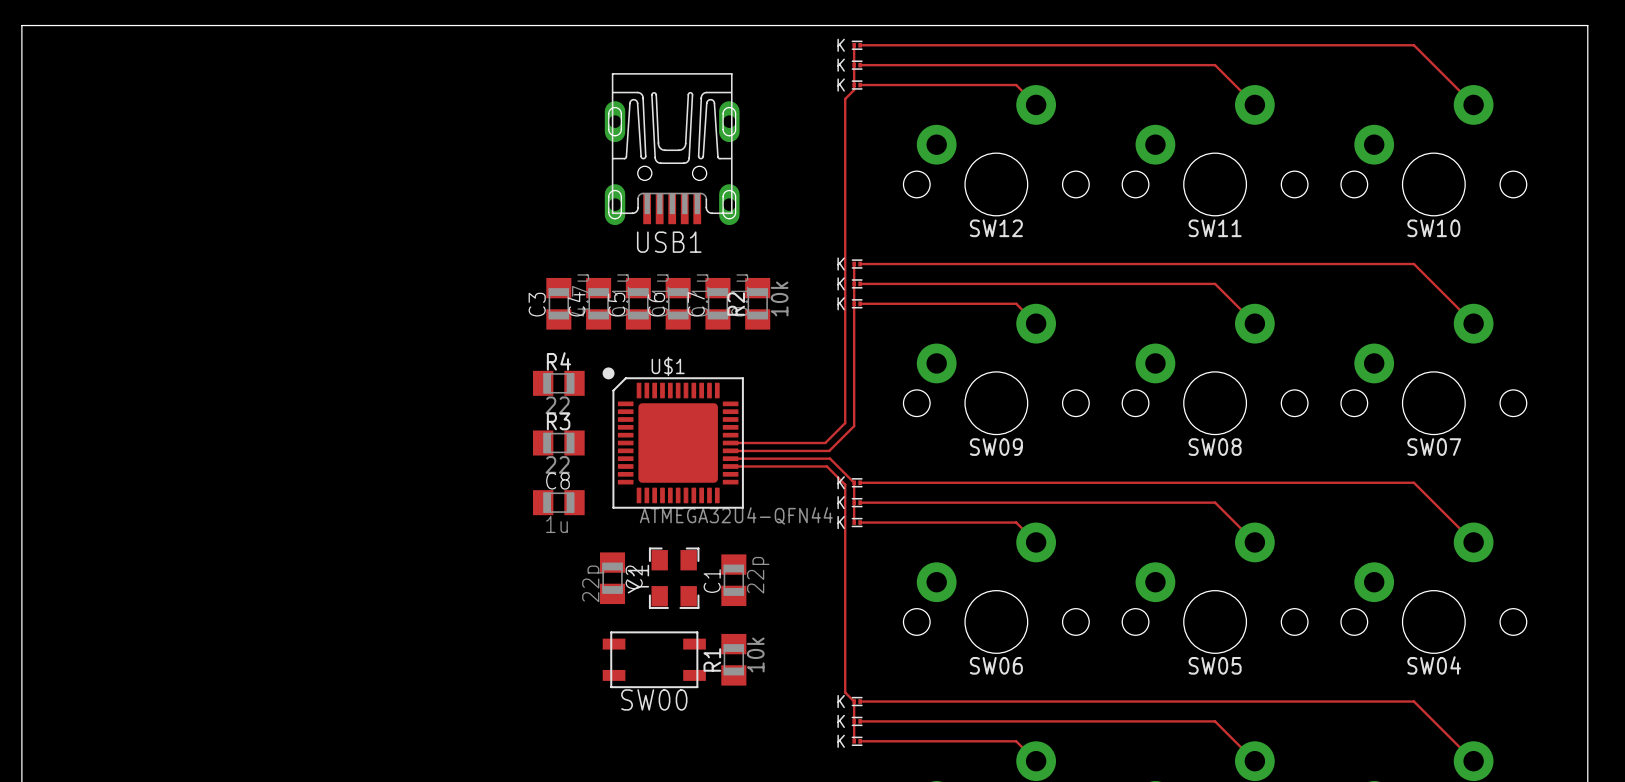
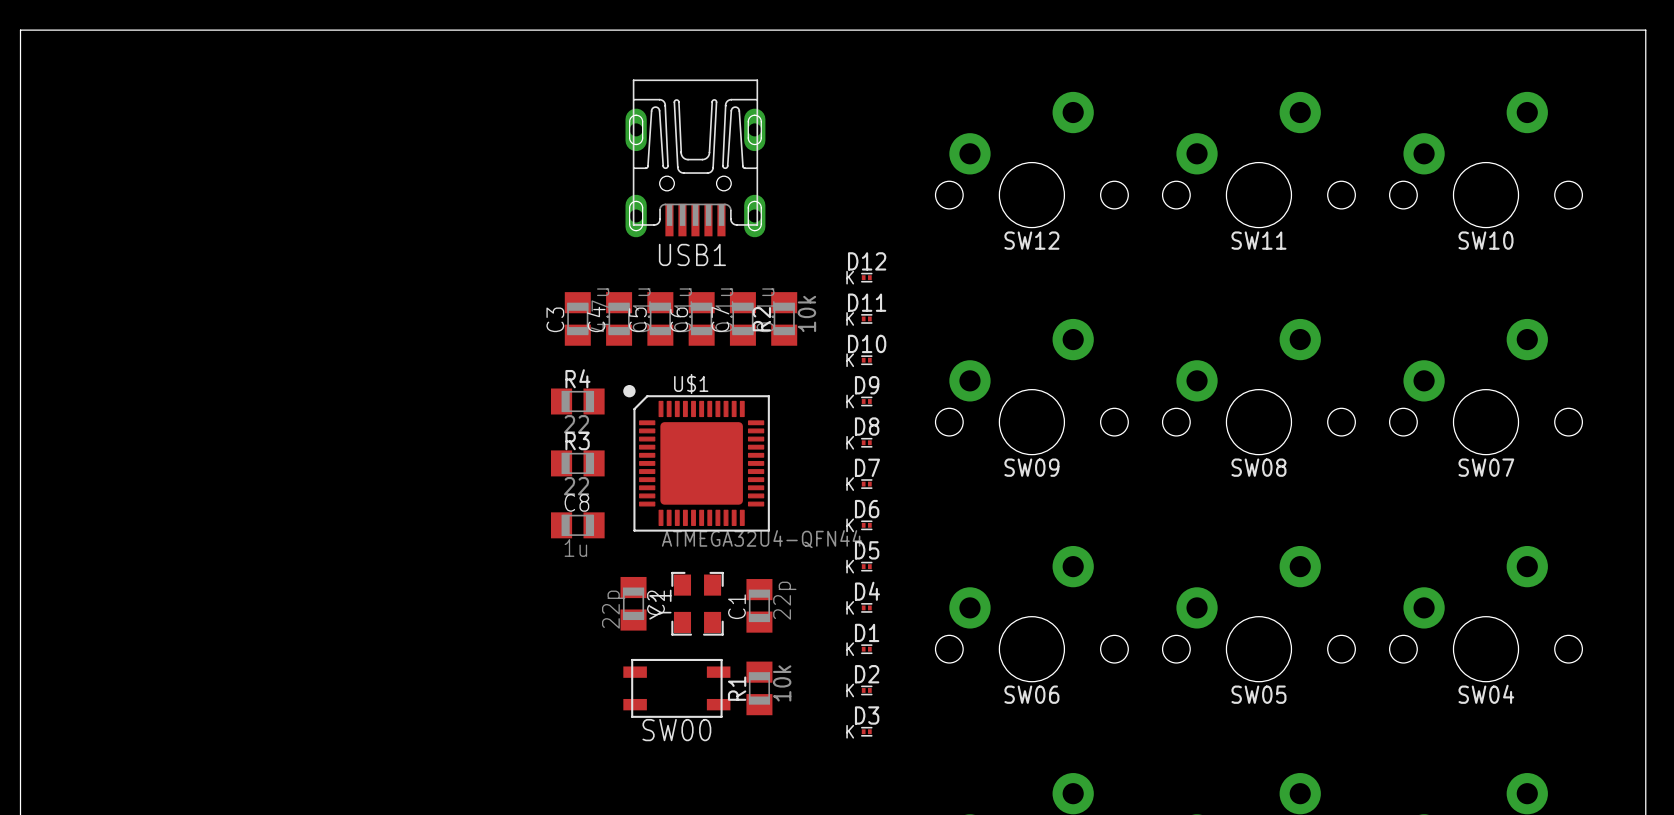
track: (854, 45) (854, 90) (845, 98) (845, 423) (825, 443) (730, 443) -> none
part: (857, 45) -> none
track: (860, 45) (1413, 45) (1473, 104) -> none
part: (857, 65) -> none
track: (860, 65) (1215, 65) (1254, 104) -> none
part: (857, 85) -> none
track: (860, 85) (1016, 85) (1036, 104) -> none
D12: none -> (866, 277)
track: (854, 264) (854, 426) (829, 450) (730, 450) -> none
part: (857, 264) -> none
track: (860, 264) (1413, 264) (1473, 323) -> none
part: (857, 283) -> none
track: (860, 283) (1215, 283) (1254, 323) -> none
D11: none -> (866, 318)
part: (857, 303) -> none
track: (860, 303) (1016, 303) (1036, 323) -> none
D10: none -> (866, 360)
D9: none -> (866, 401)
D8: none -> (866, 442)
track: (730, 458) (830, 458) (854, 482) (854, 522) -> none
D7: none -> (866, 484)
track: (730, 466) (826, 466) (845, 484) (845, 692) (854, 701) (854, 741) -> none
part: (857, 482) -> none
track: (860, 482) (1413, 482) (1473, 542) -> none
D6: none -> (866, 525)
part: (857, 502) -> none
track: (860, 502) (1215, 502) (1254, 542) -> none
part: (857, 522) -> none
track: (860, 522) (1016, 522) (1036, 542) -> none
D5: none -> (866, 566)
D4: none -> (866, 607)
D1: none -> (866, 649)
D2: none -> (866, 690)
D3: none -> (866, 731)
part: (857, 701) -> none
track: (860, 701) (1413, 701) (1473, 761) -> none
part: (857, 721) -> none
track: (860, 721) (1215, 721) (1254, 761) -> none
part: (857, 741) -> none
track: (860, 741) (1016, 741) (1036, 761) -> none

